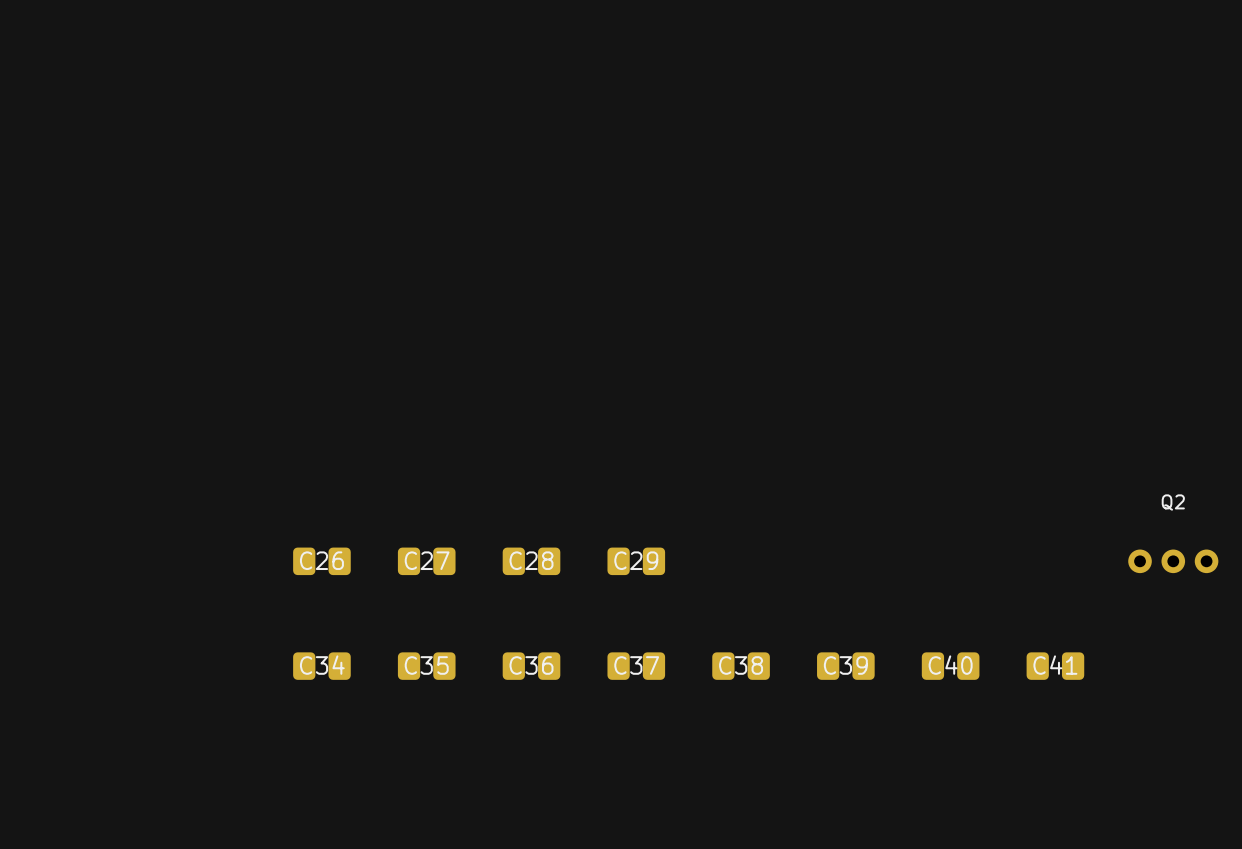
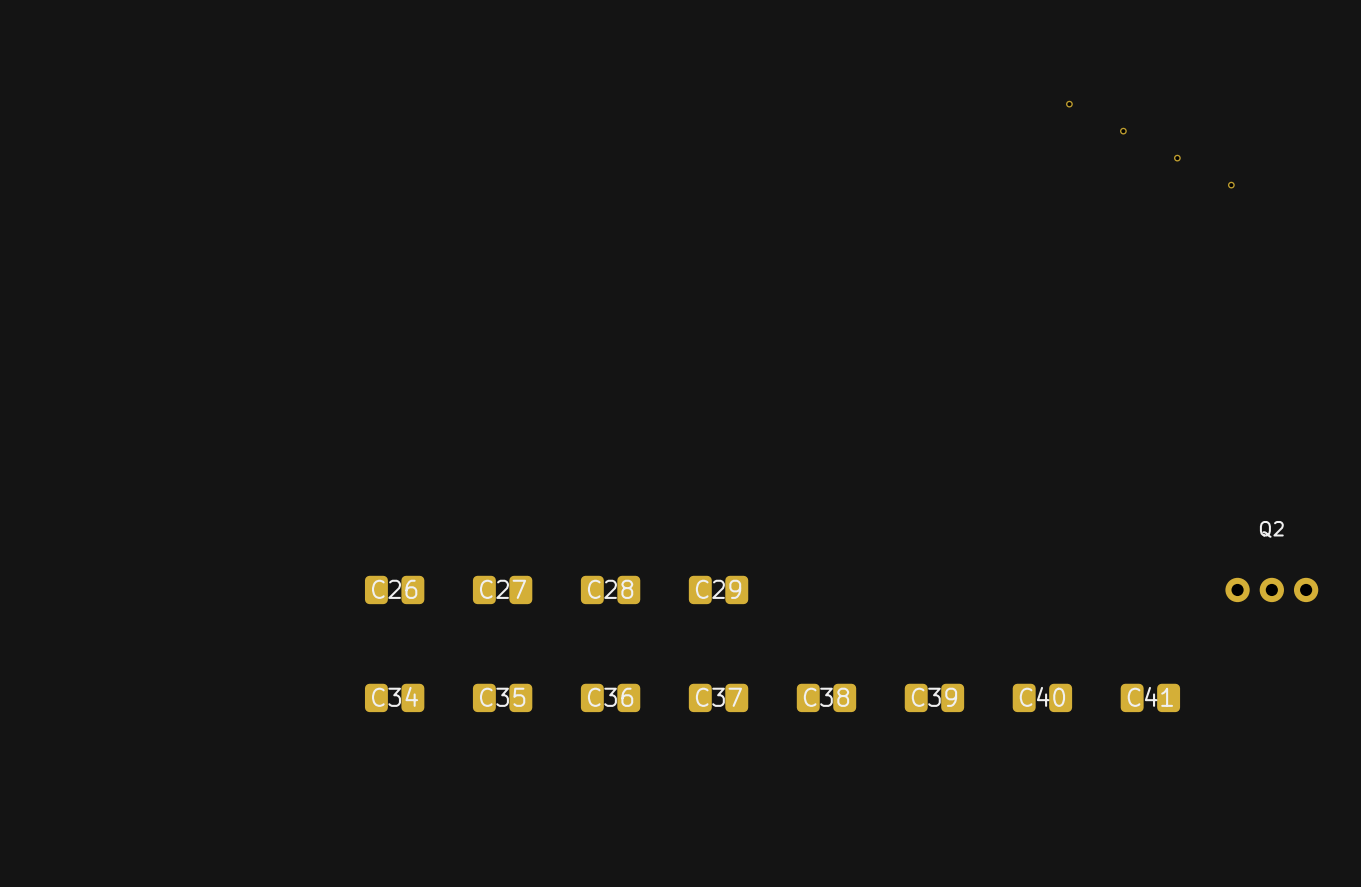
via: none -> (1069, 104)
via: none -> (1123, 131)
via: none -> (1177, 158)
via: none -> (1231, 185)

